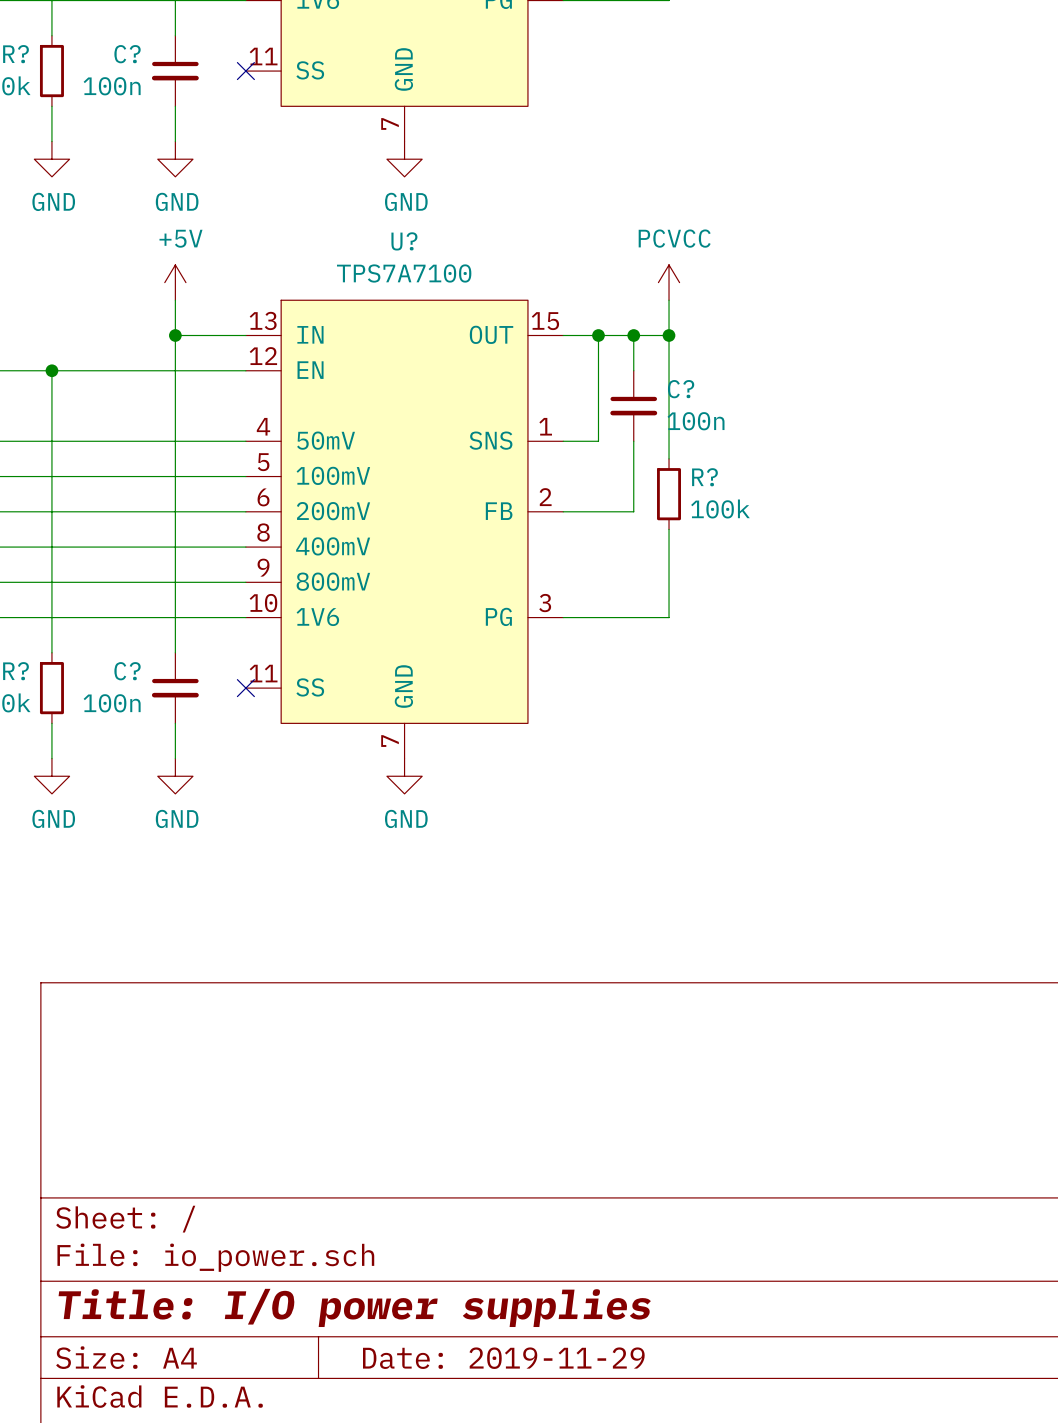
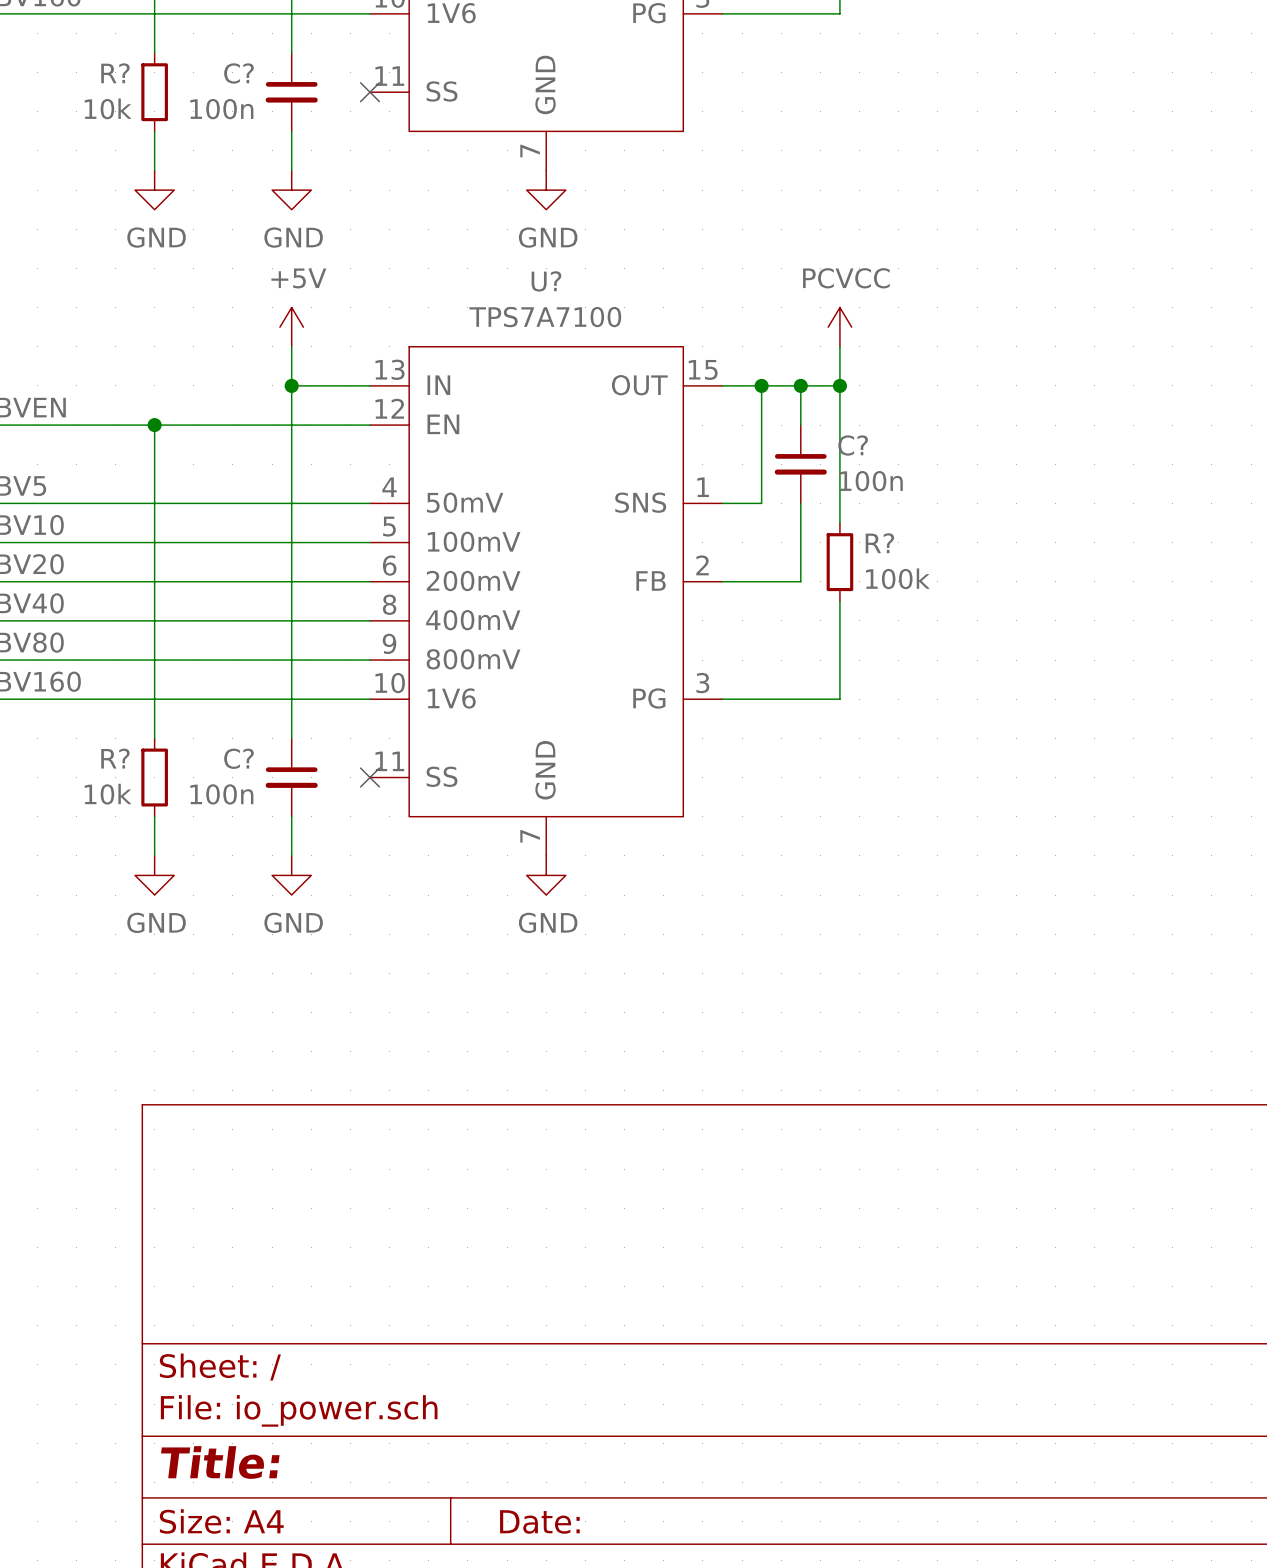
title block: Title: I/O power supplies (354, 1307) -> Title: (220, 1462)
title block: Date: 2019-11-29 (503, 1358) -> Date: (539, 1521)

